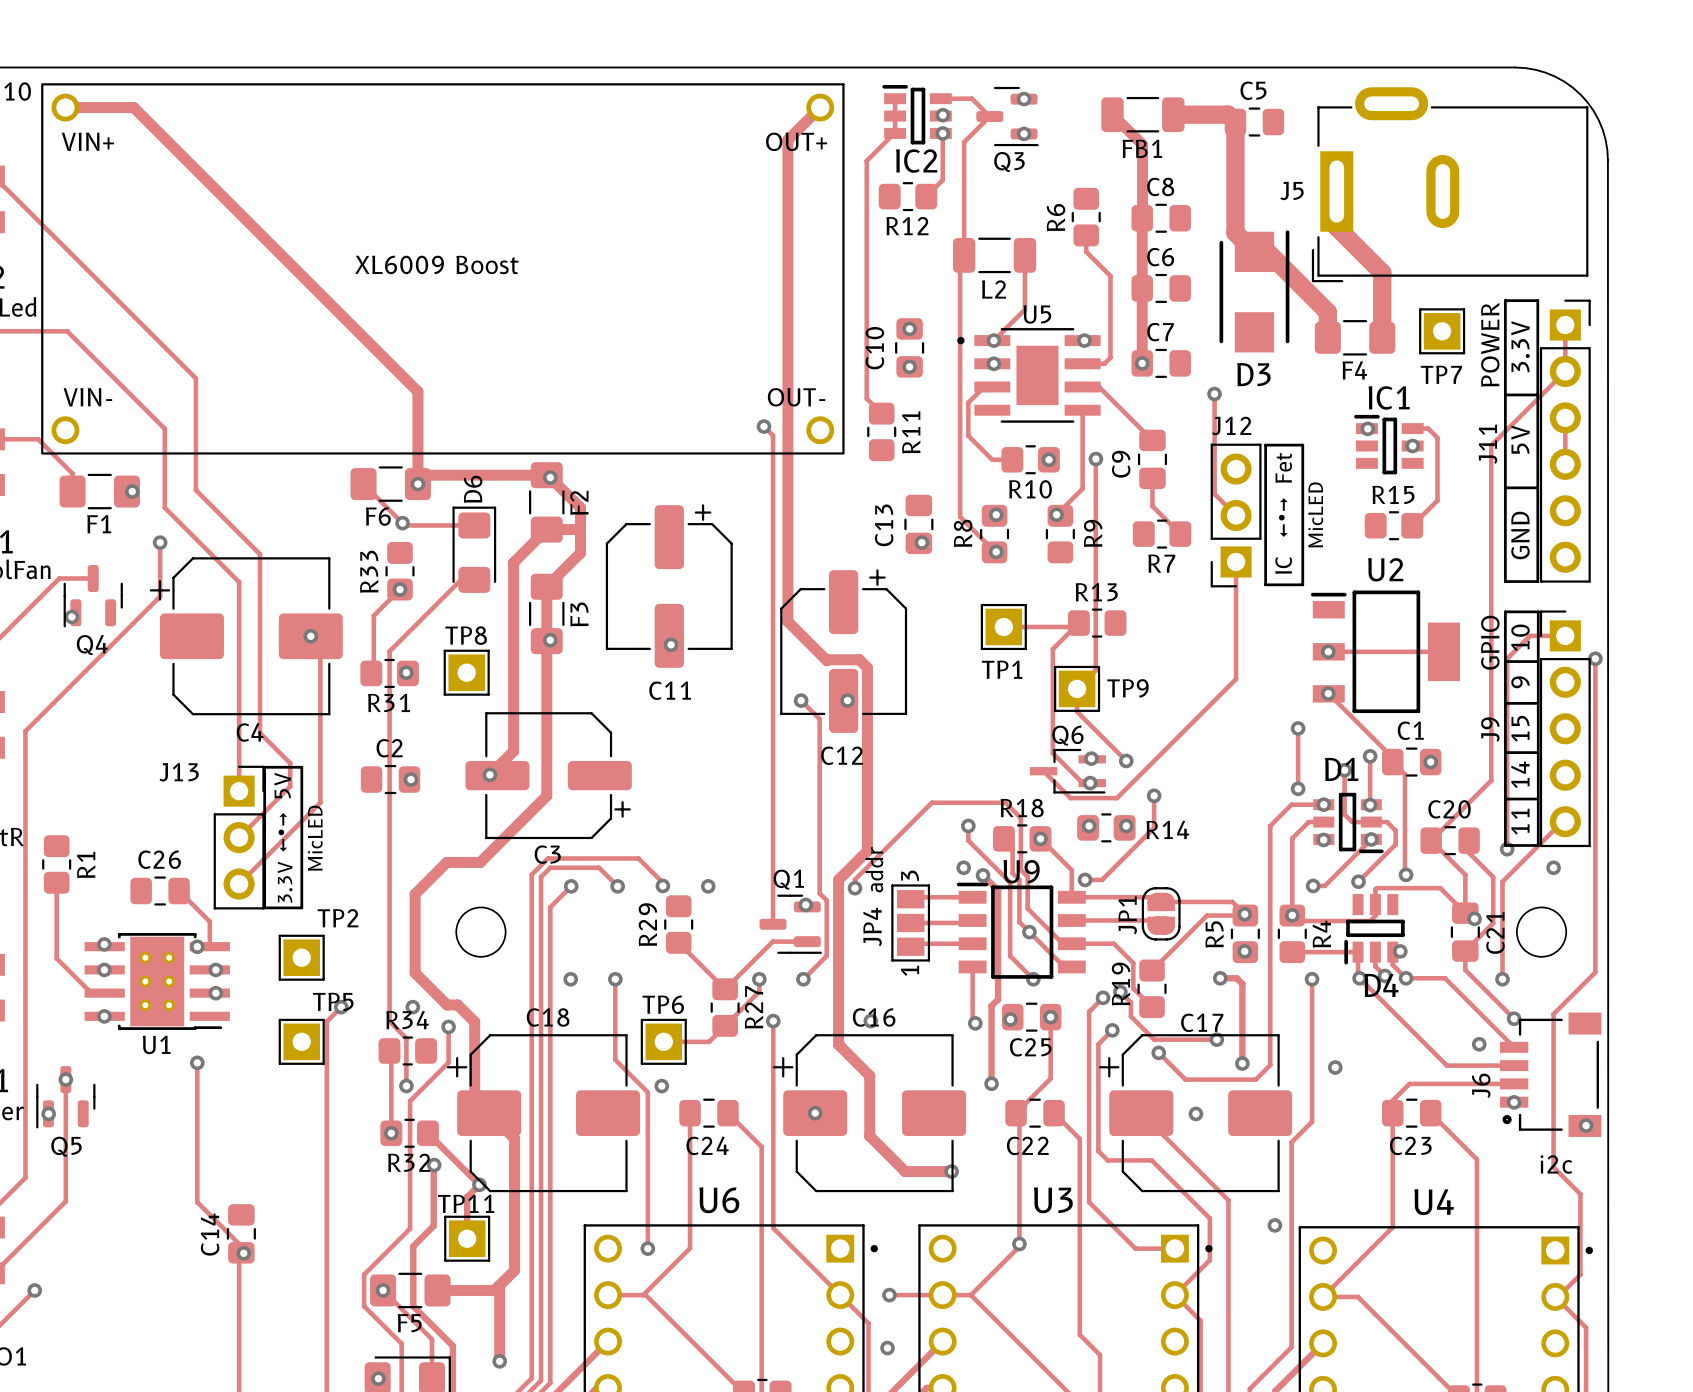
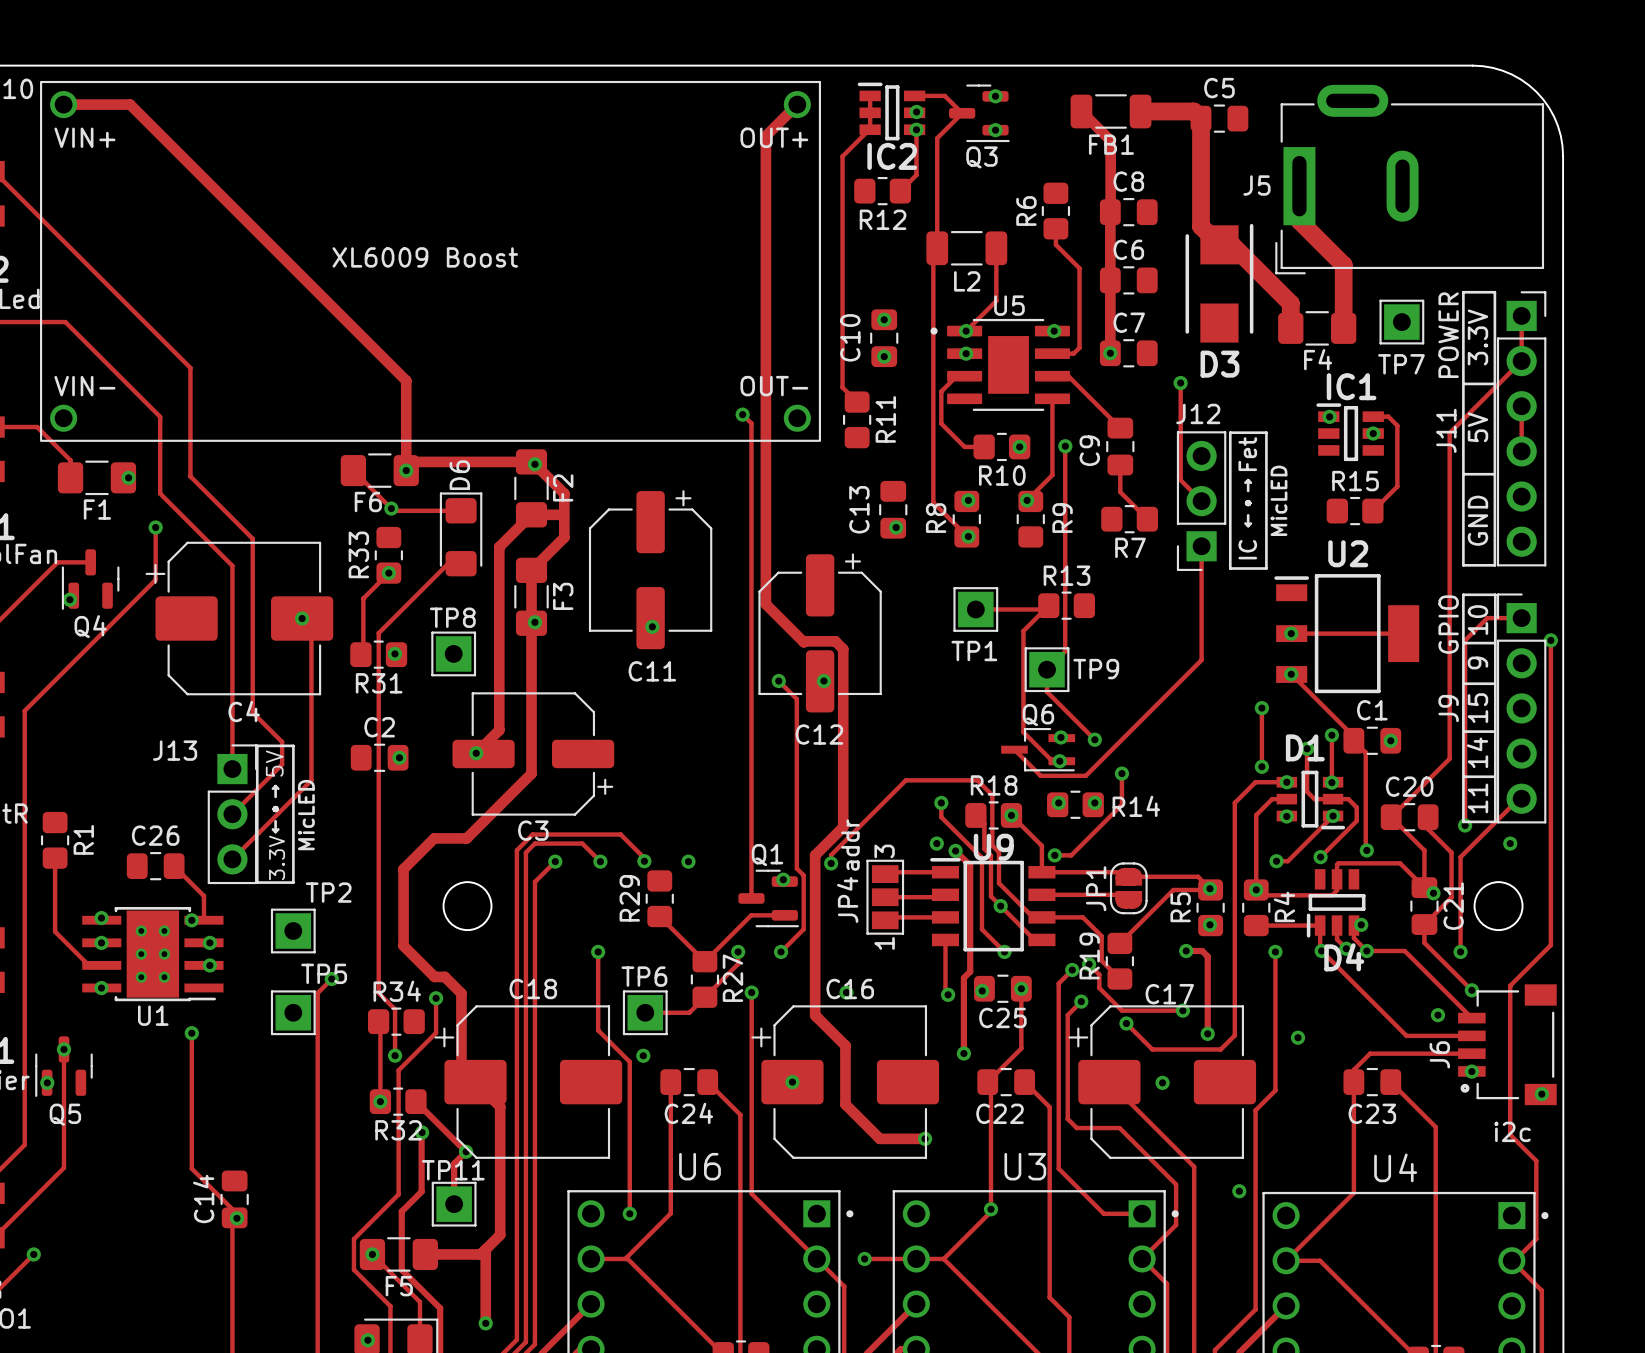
via: (570, 979) -> none
via: (412, 1007) -> none
via: (887, 1348) -> none

